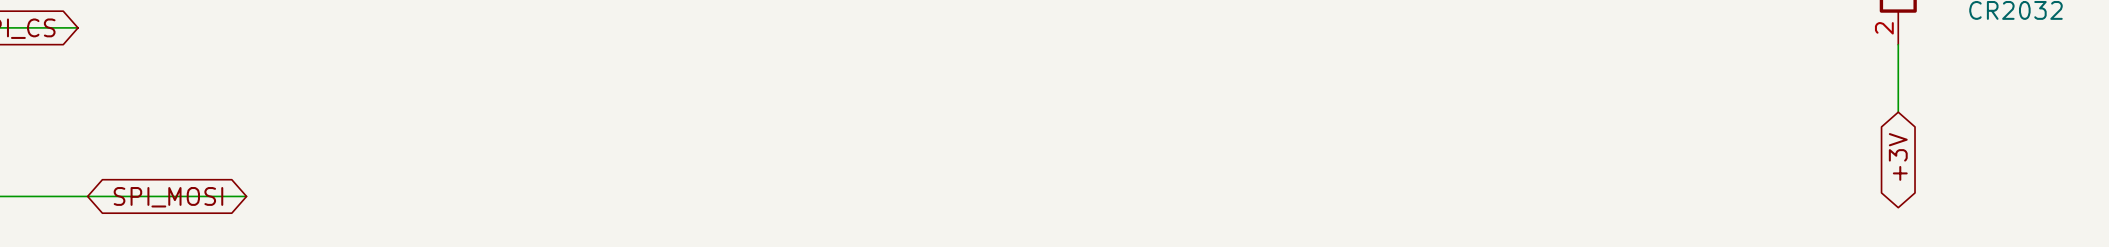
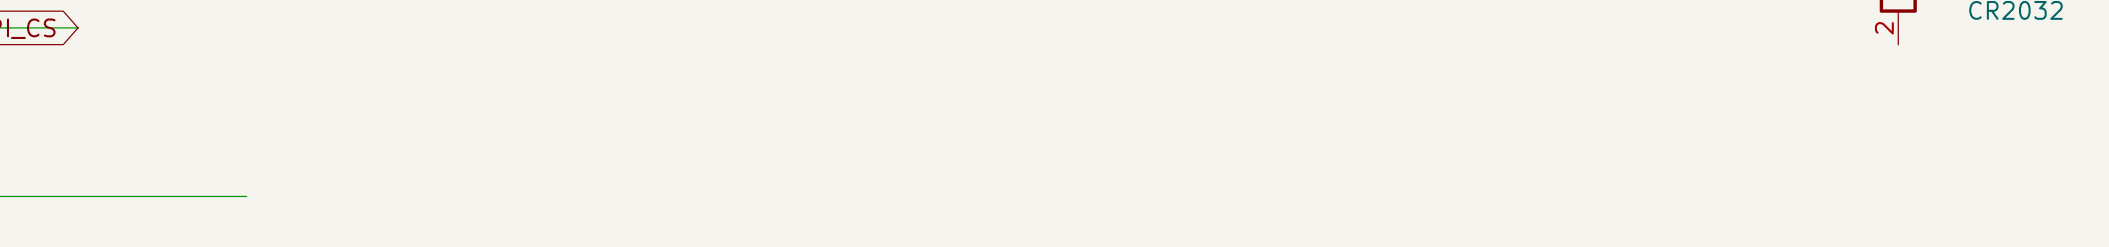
wire: (1898, 44) (1898, 112) -> none
global label: +3V (1898, 156) -> none
global label: SPI_MOSI (168, 197) -> none

